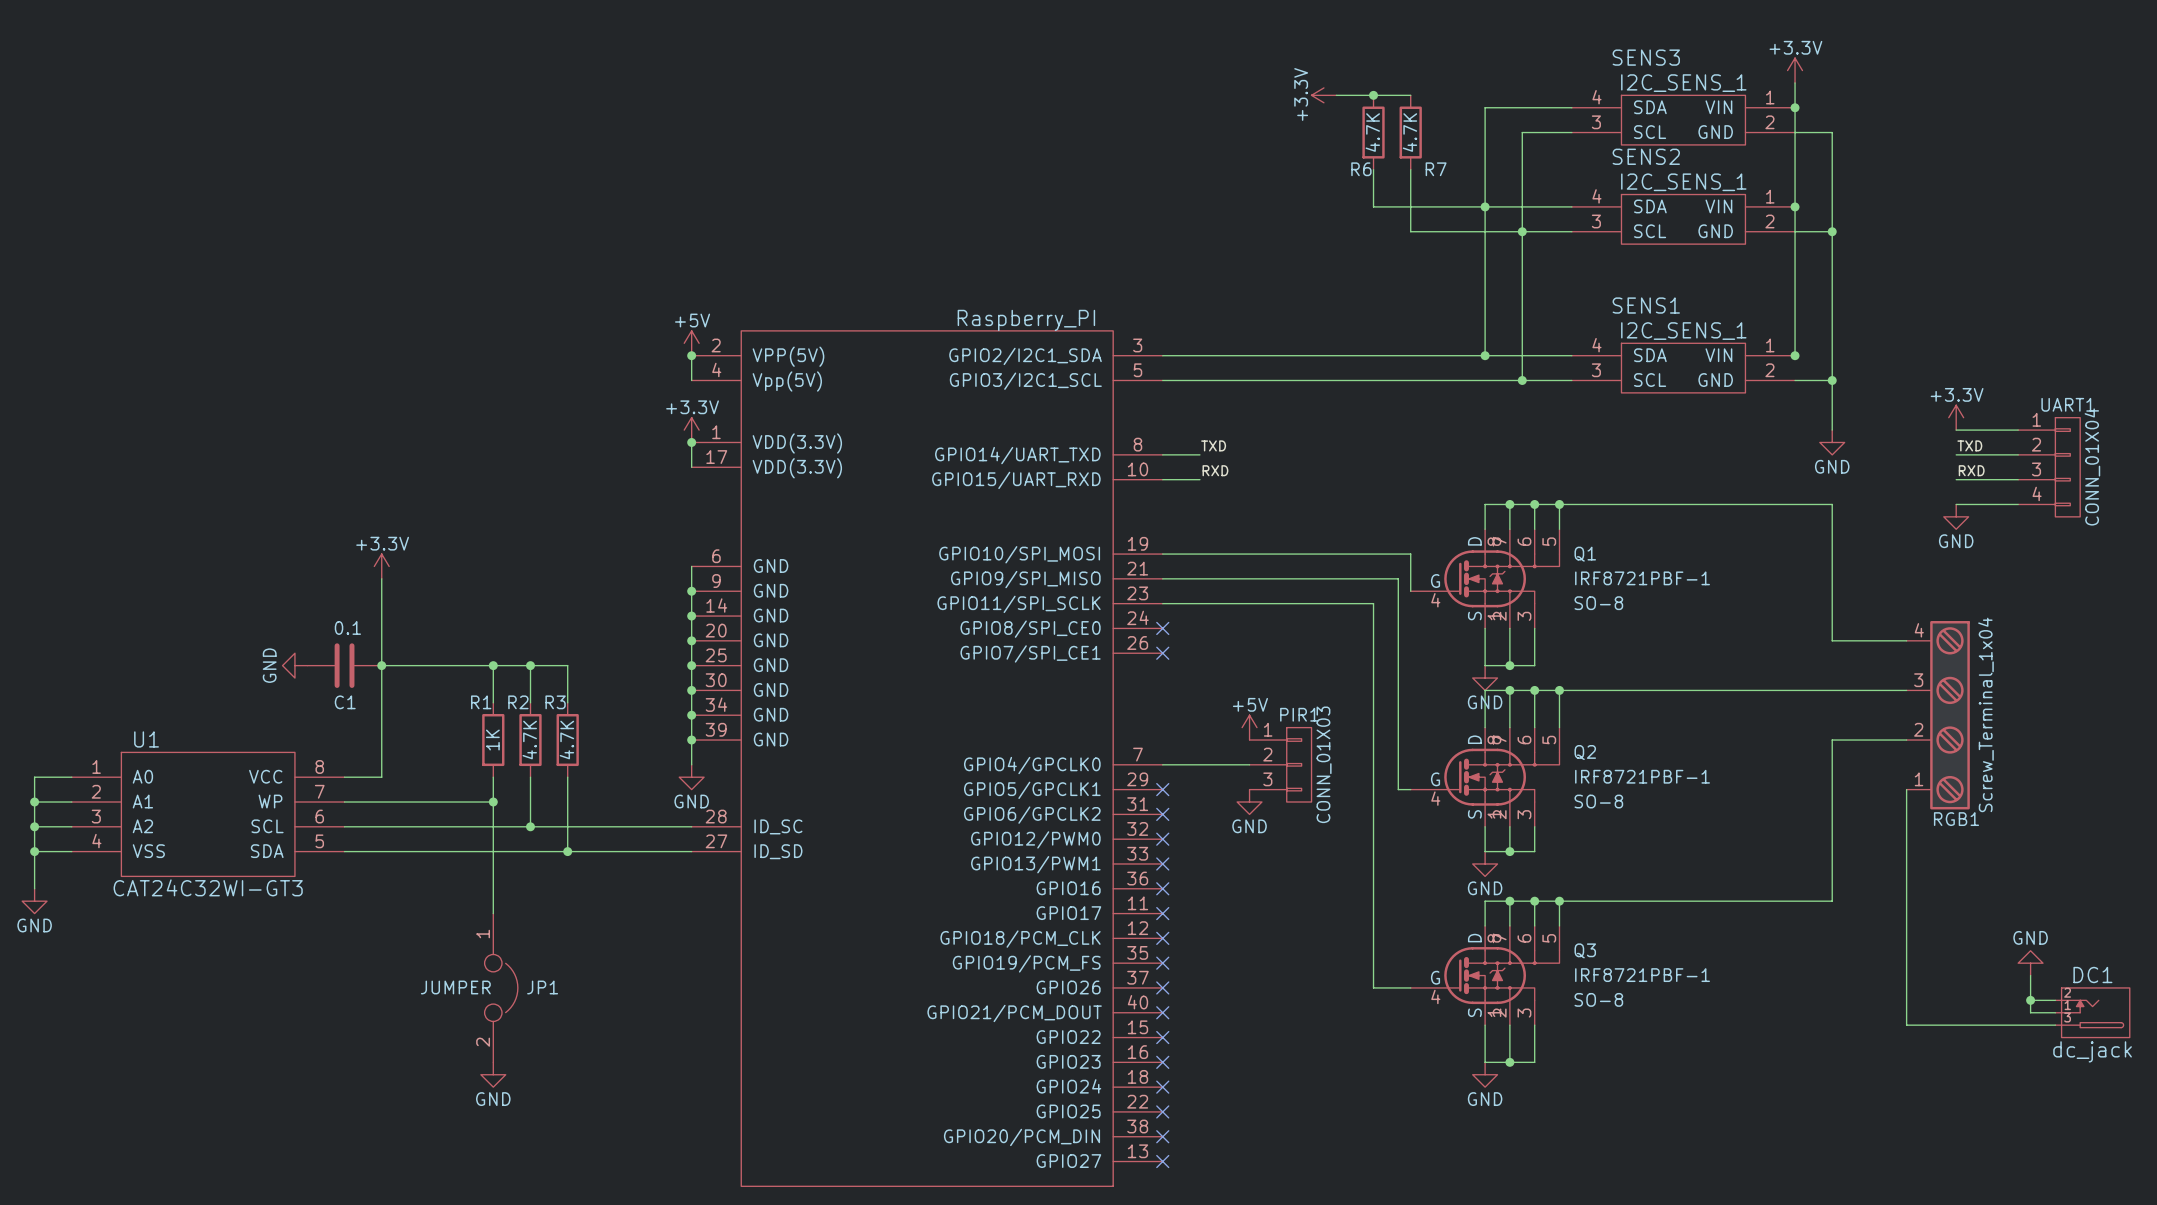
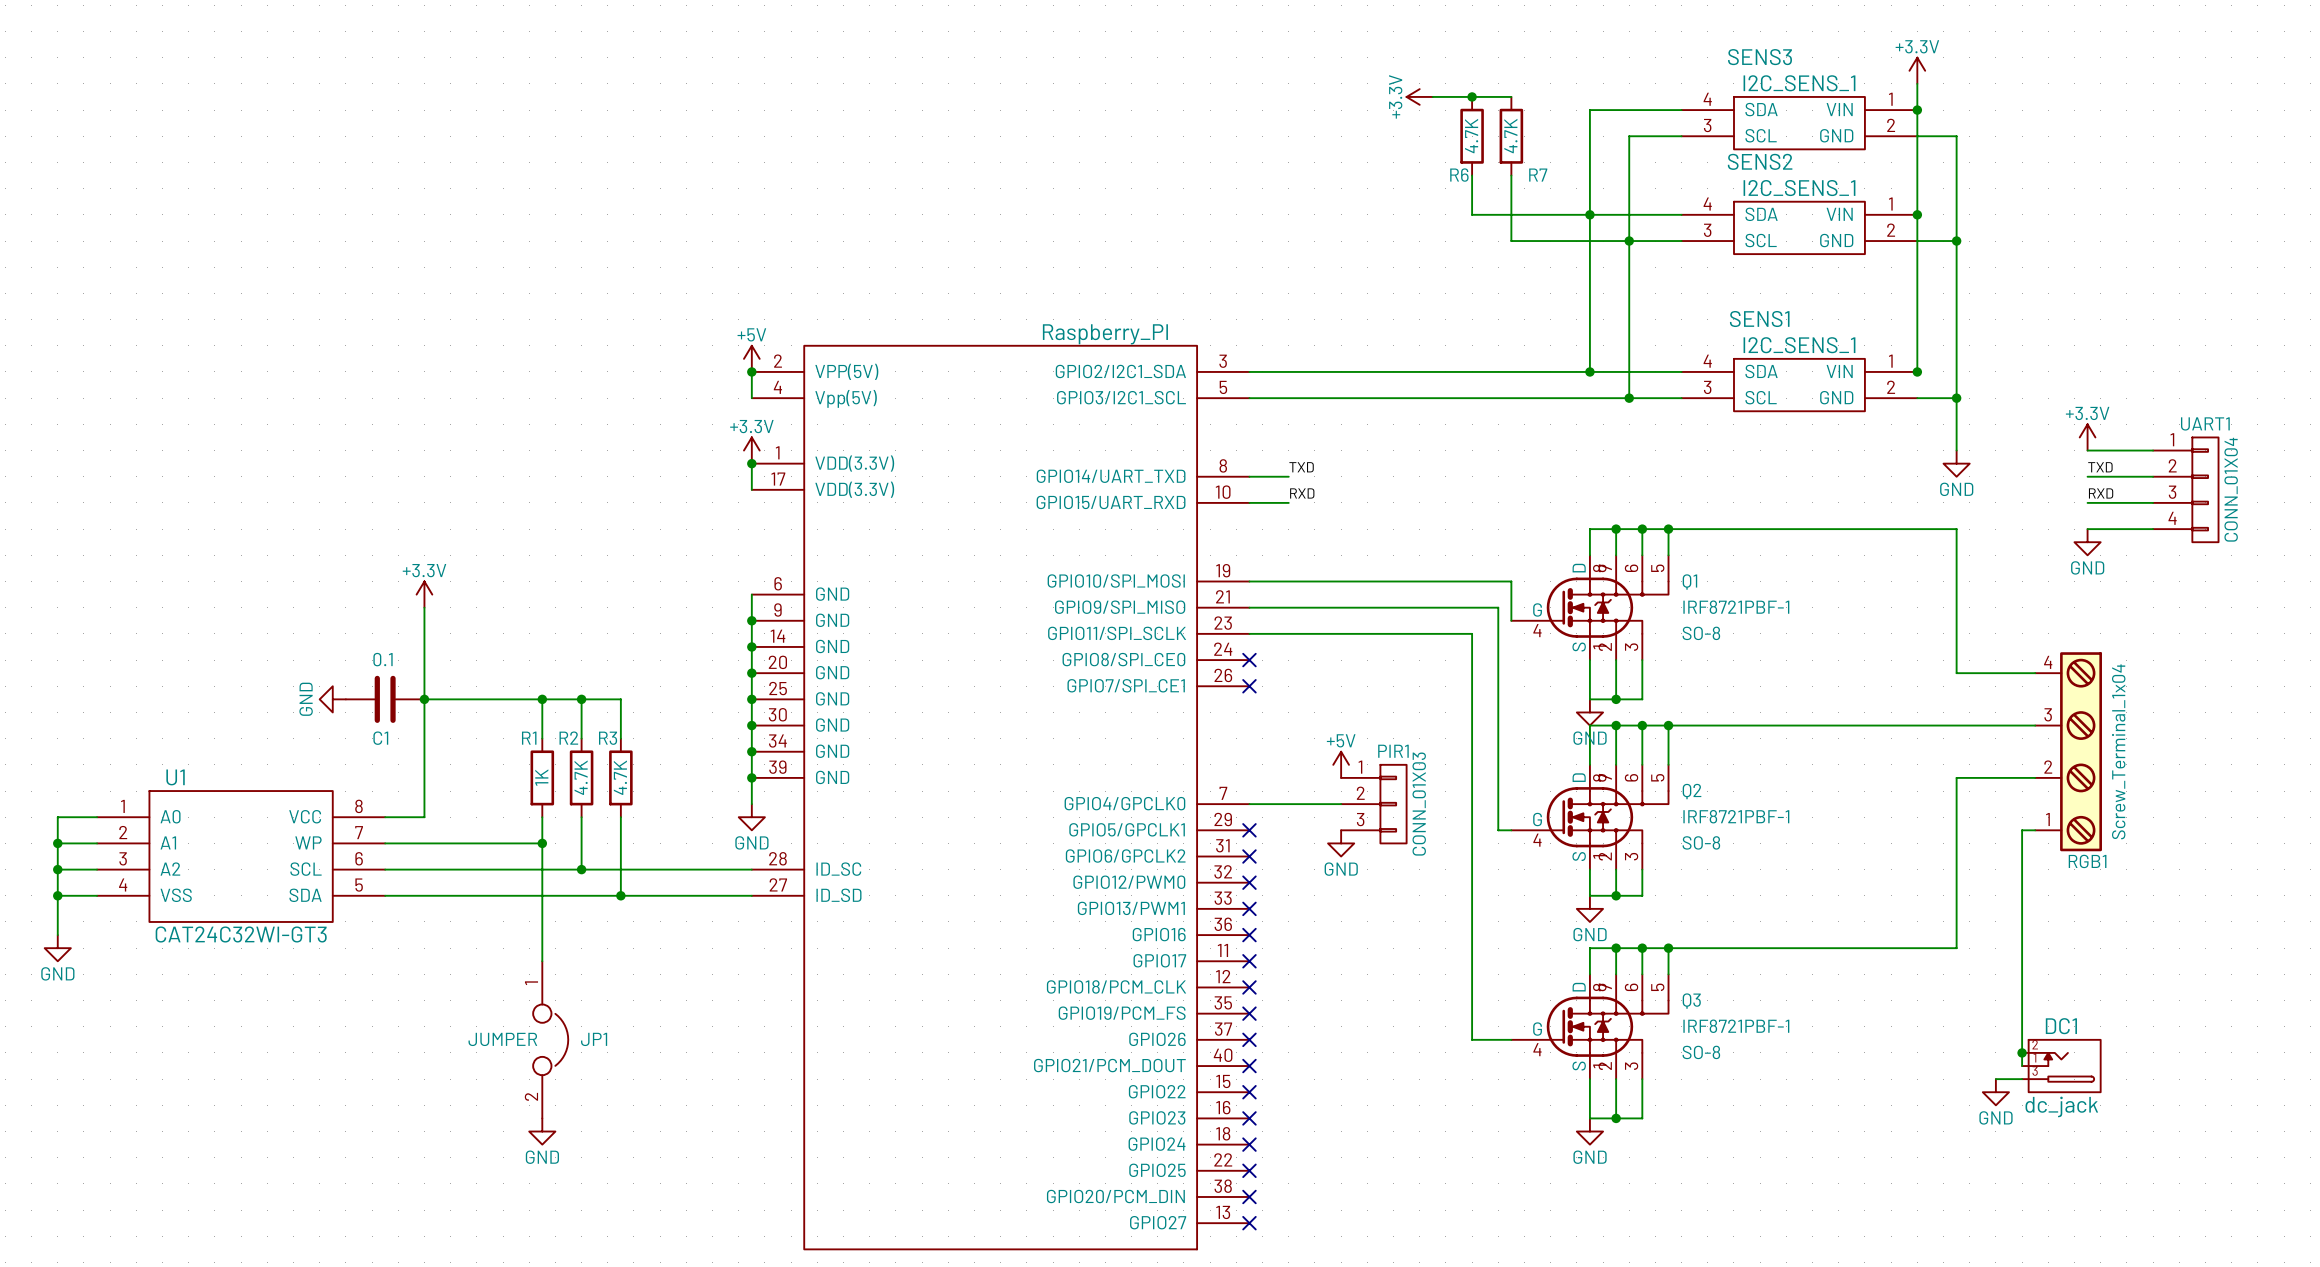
wire: (1906, 789) (1906, 1025) (2055, 1025) -> (2035, 830) (2022, 830) (2022, 1066)
power symbol rotation: 0° (2030, 963) -> 180° (1995, 1092)
power symbol position: GND (2030, 963) -> GND (1995, 1092)
wire: (2030, 975) (2030, 1012) (2055, 1012) -> none
junction: none -> (2022, 1052)
wire: (2030, 1000) (2055, 1000) -> (1995, 1079) (2022, 1079)
junction: (2030, 1000) -> none
DC1 position: (2092, 1012) -> (2061, 1066)

